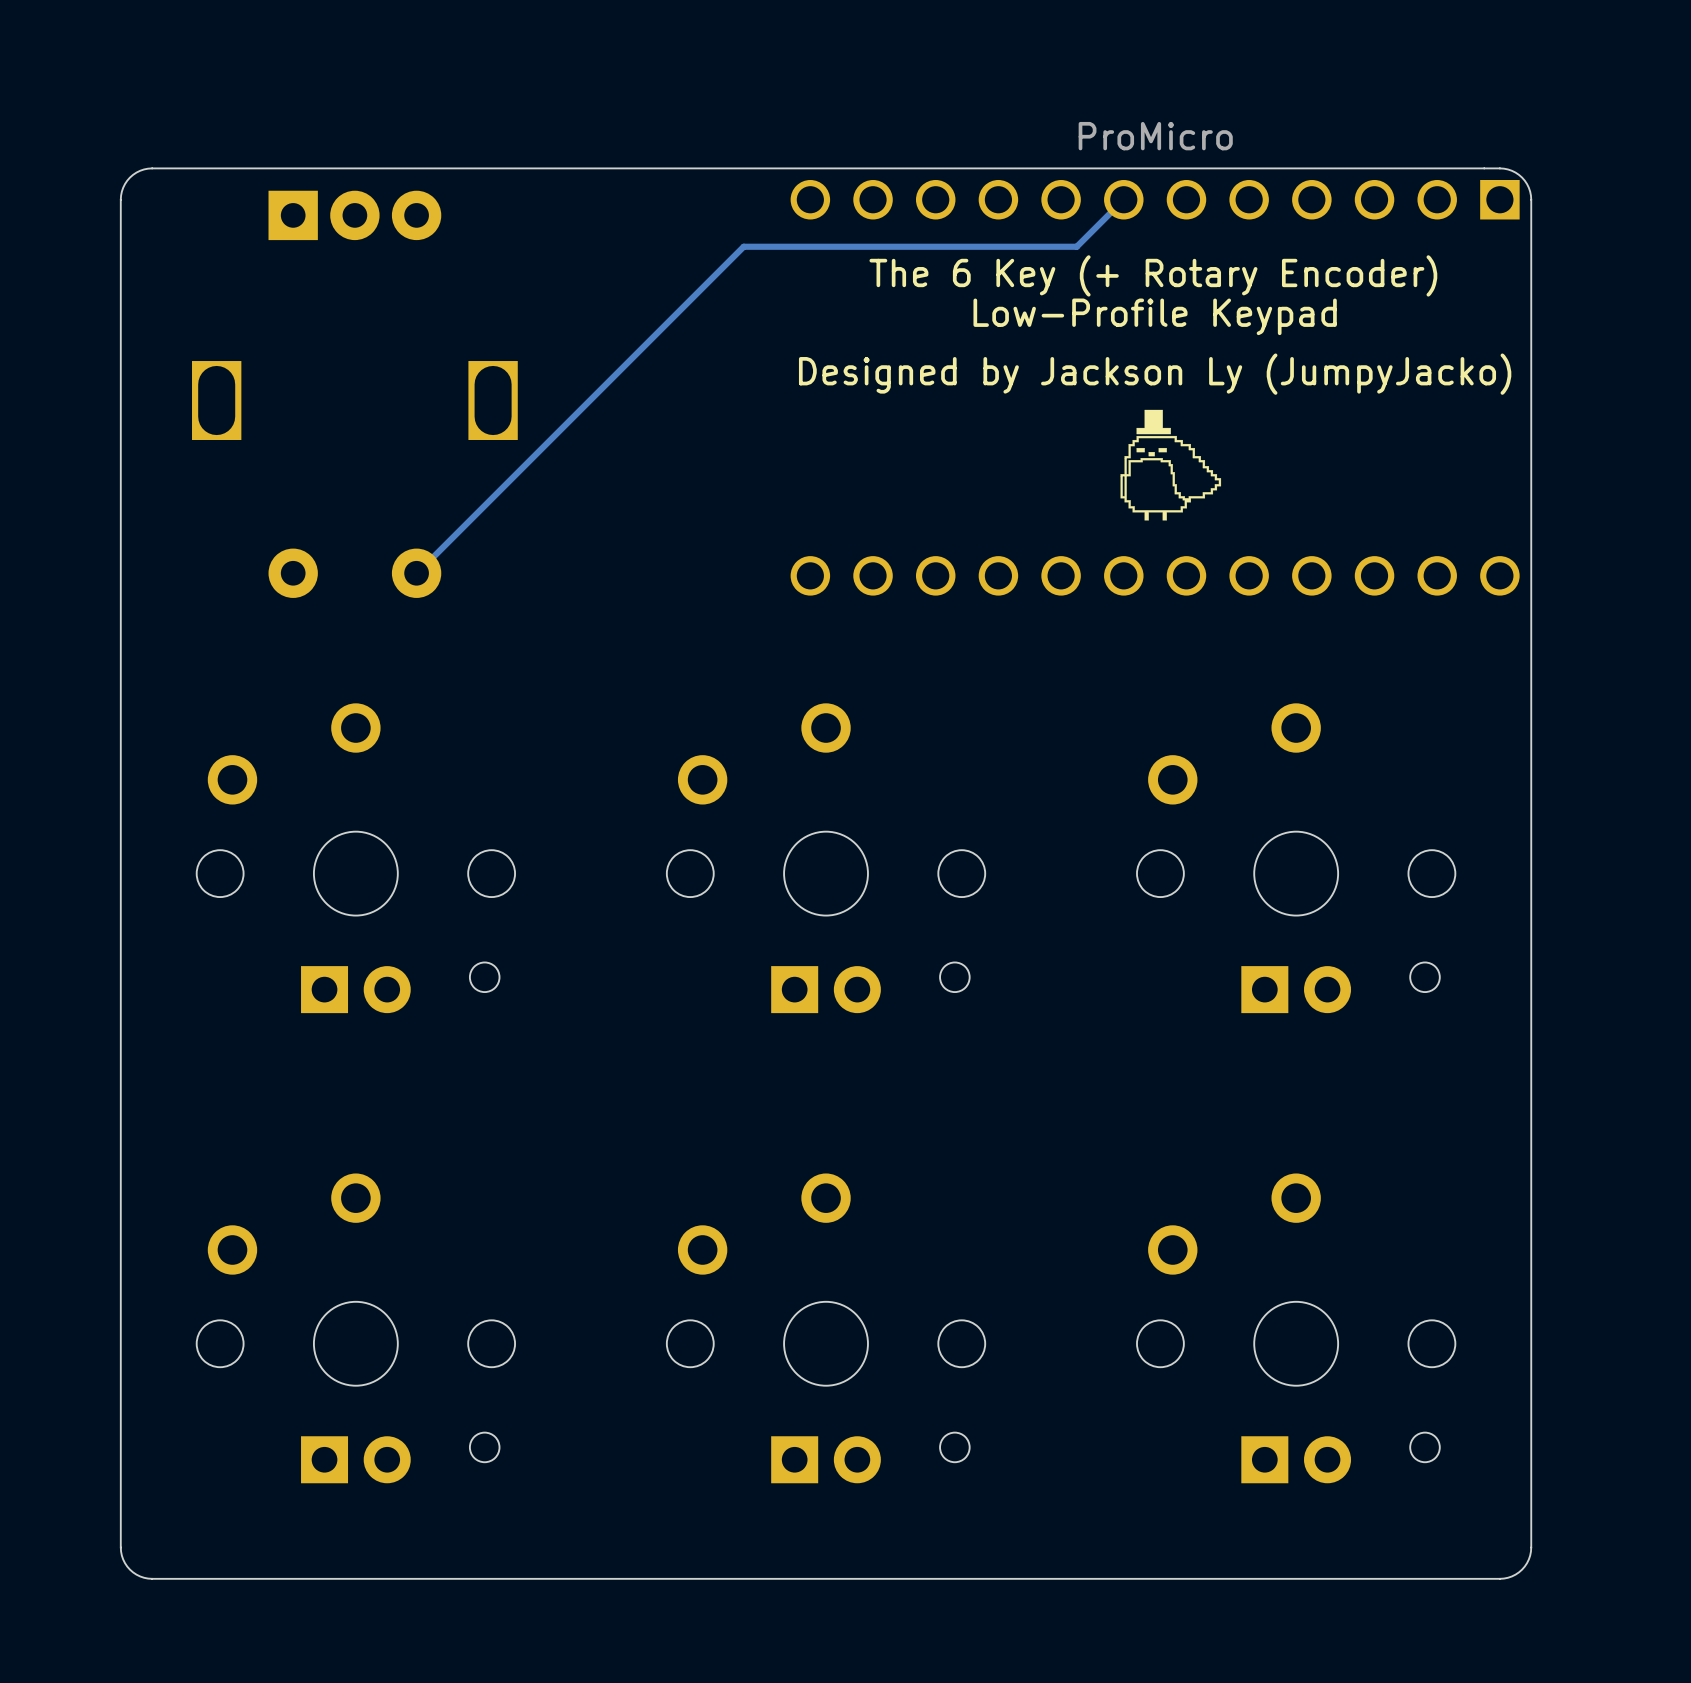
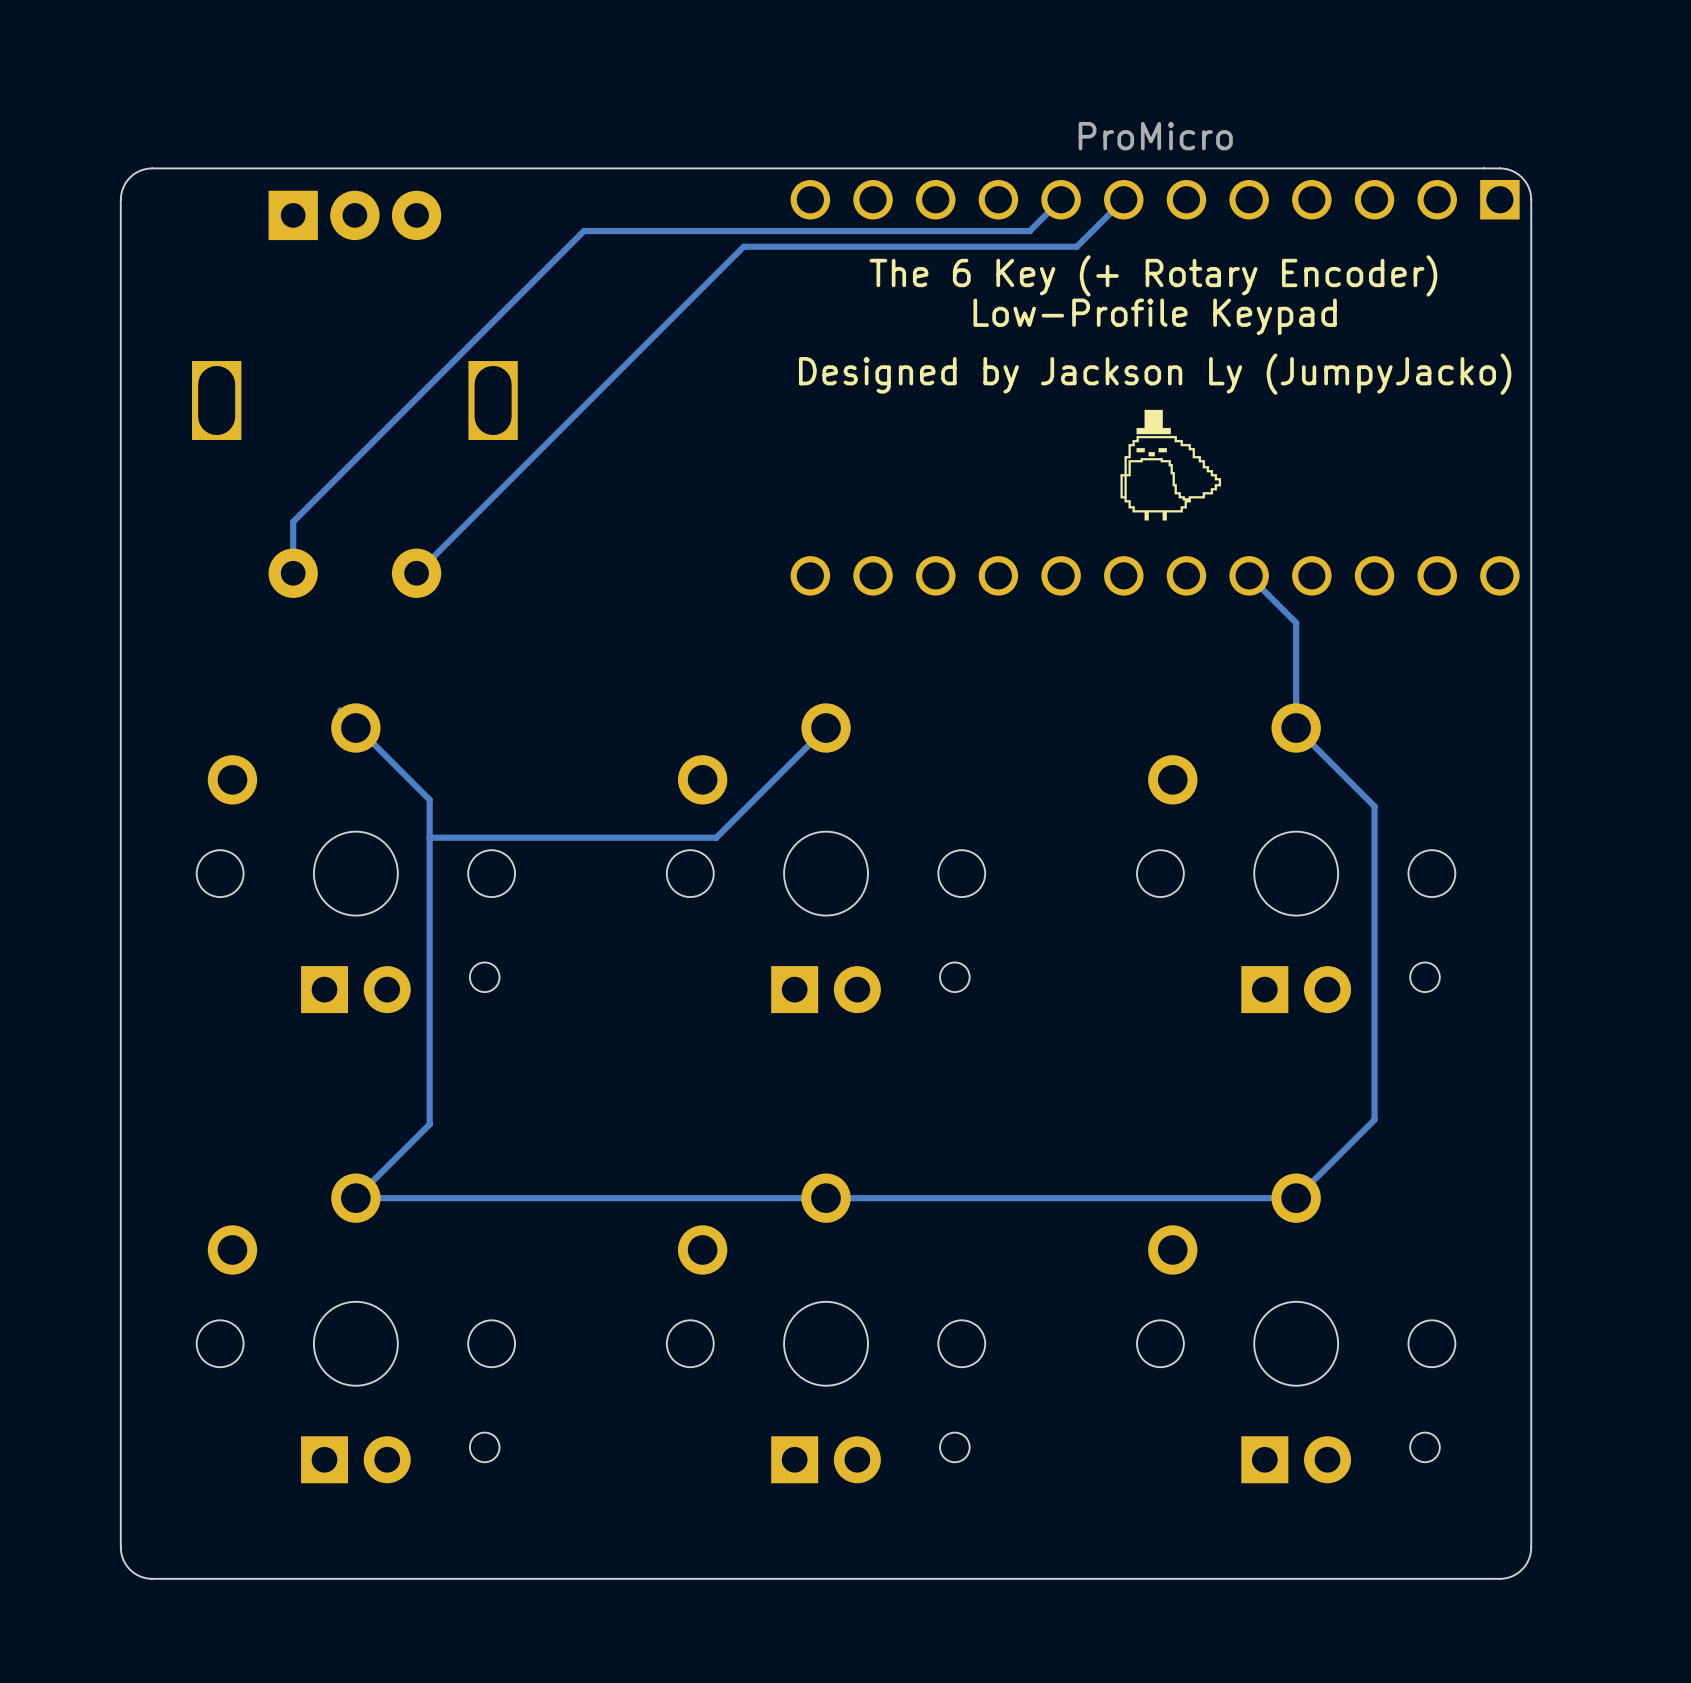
track: none -> (1061, 199) (1029, 231) (583, 231) (293, 521) (293, 573)
track: none -> (1249, 575) (1296, 622) (1296, 728) (1374, 806) (1374, 1119) (1296, 1198) (355, 1198) (429, 1124) (429, 799) (340, 710)
track: none -> (826, 728) (716, 837) (429, 837)

